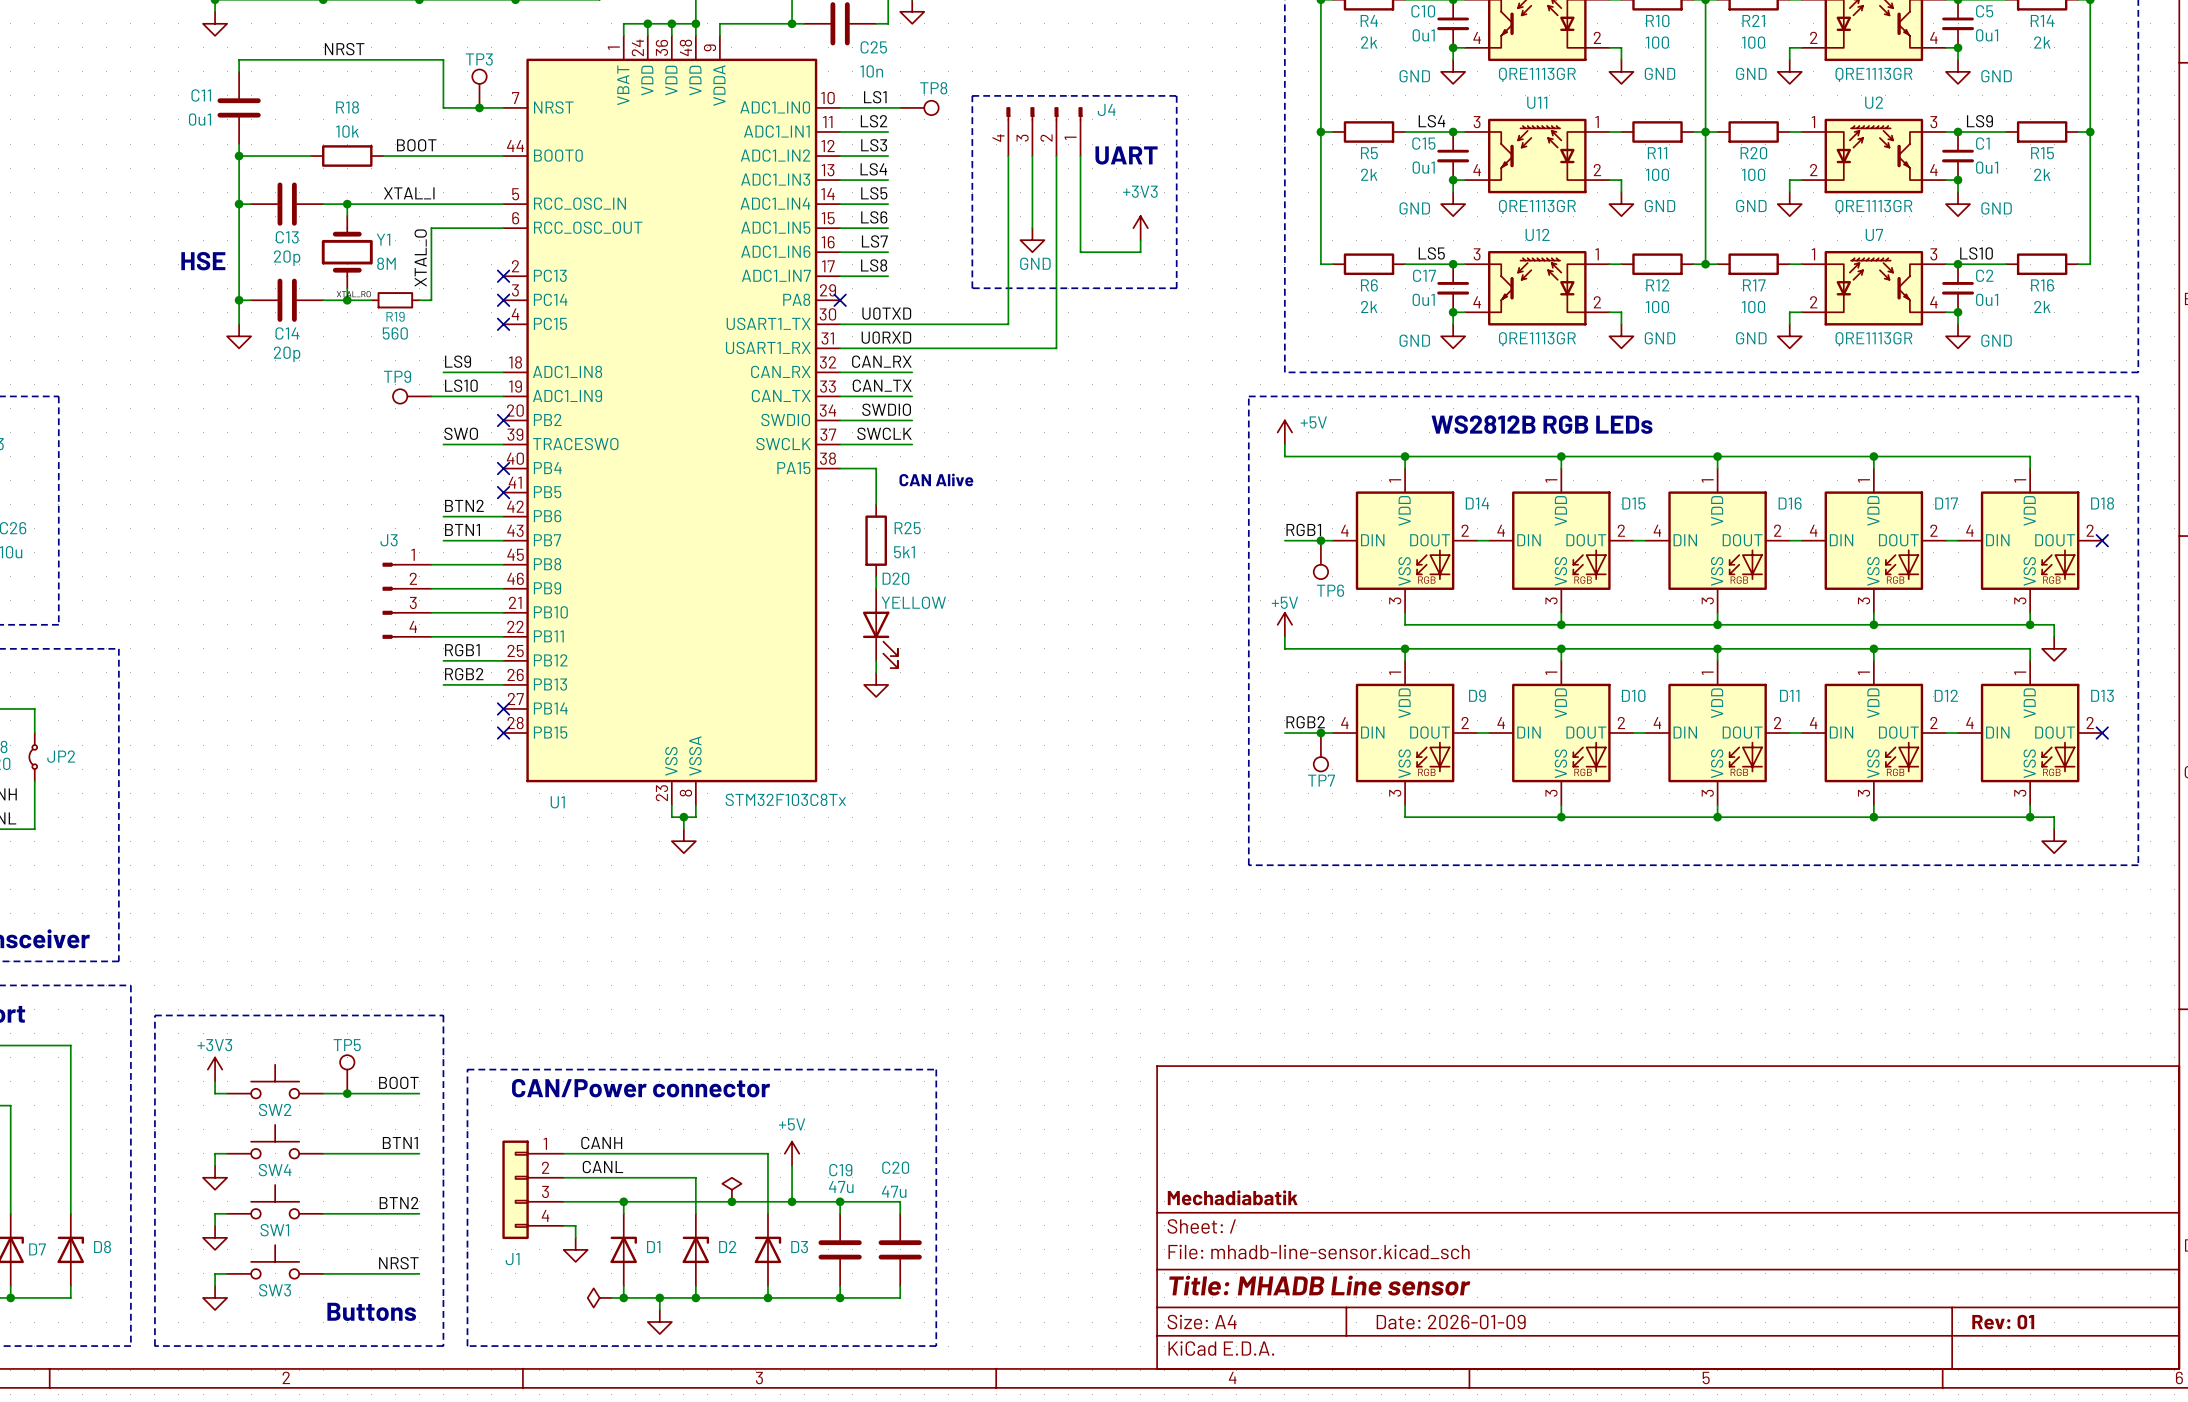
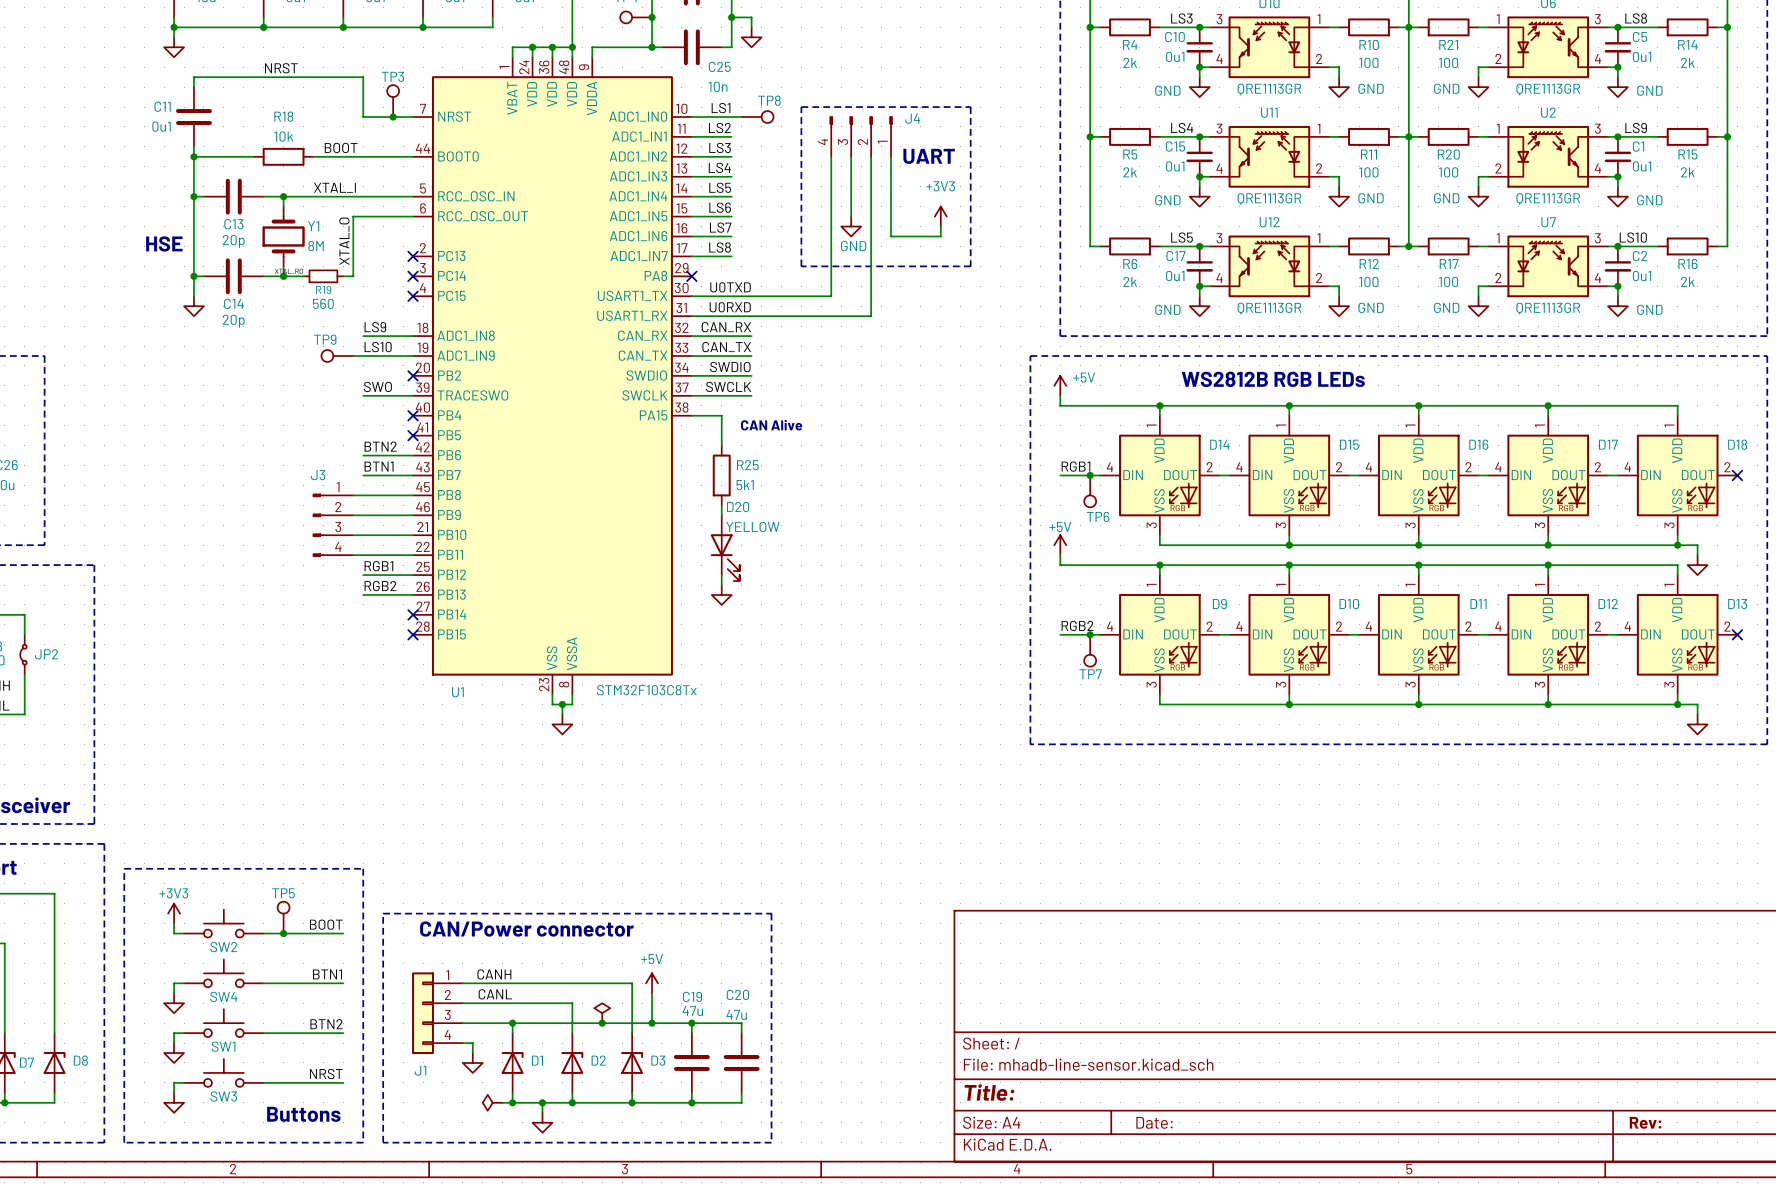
title block: Mechadiabatik (1232, 1197) -> none
title block: Title: MHADB Line sensor (1319, 1285) -> Title: (989, 1092)
title block: Date: 2026-01-09 (1451, 1322) -> Date: (1154, 1122)
title block: Rev: 01 (2003, 1322) -> Rev: (1645, 1122)

